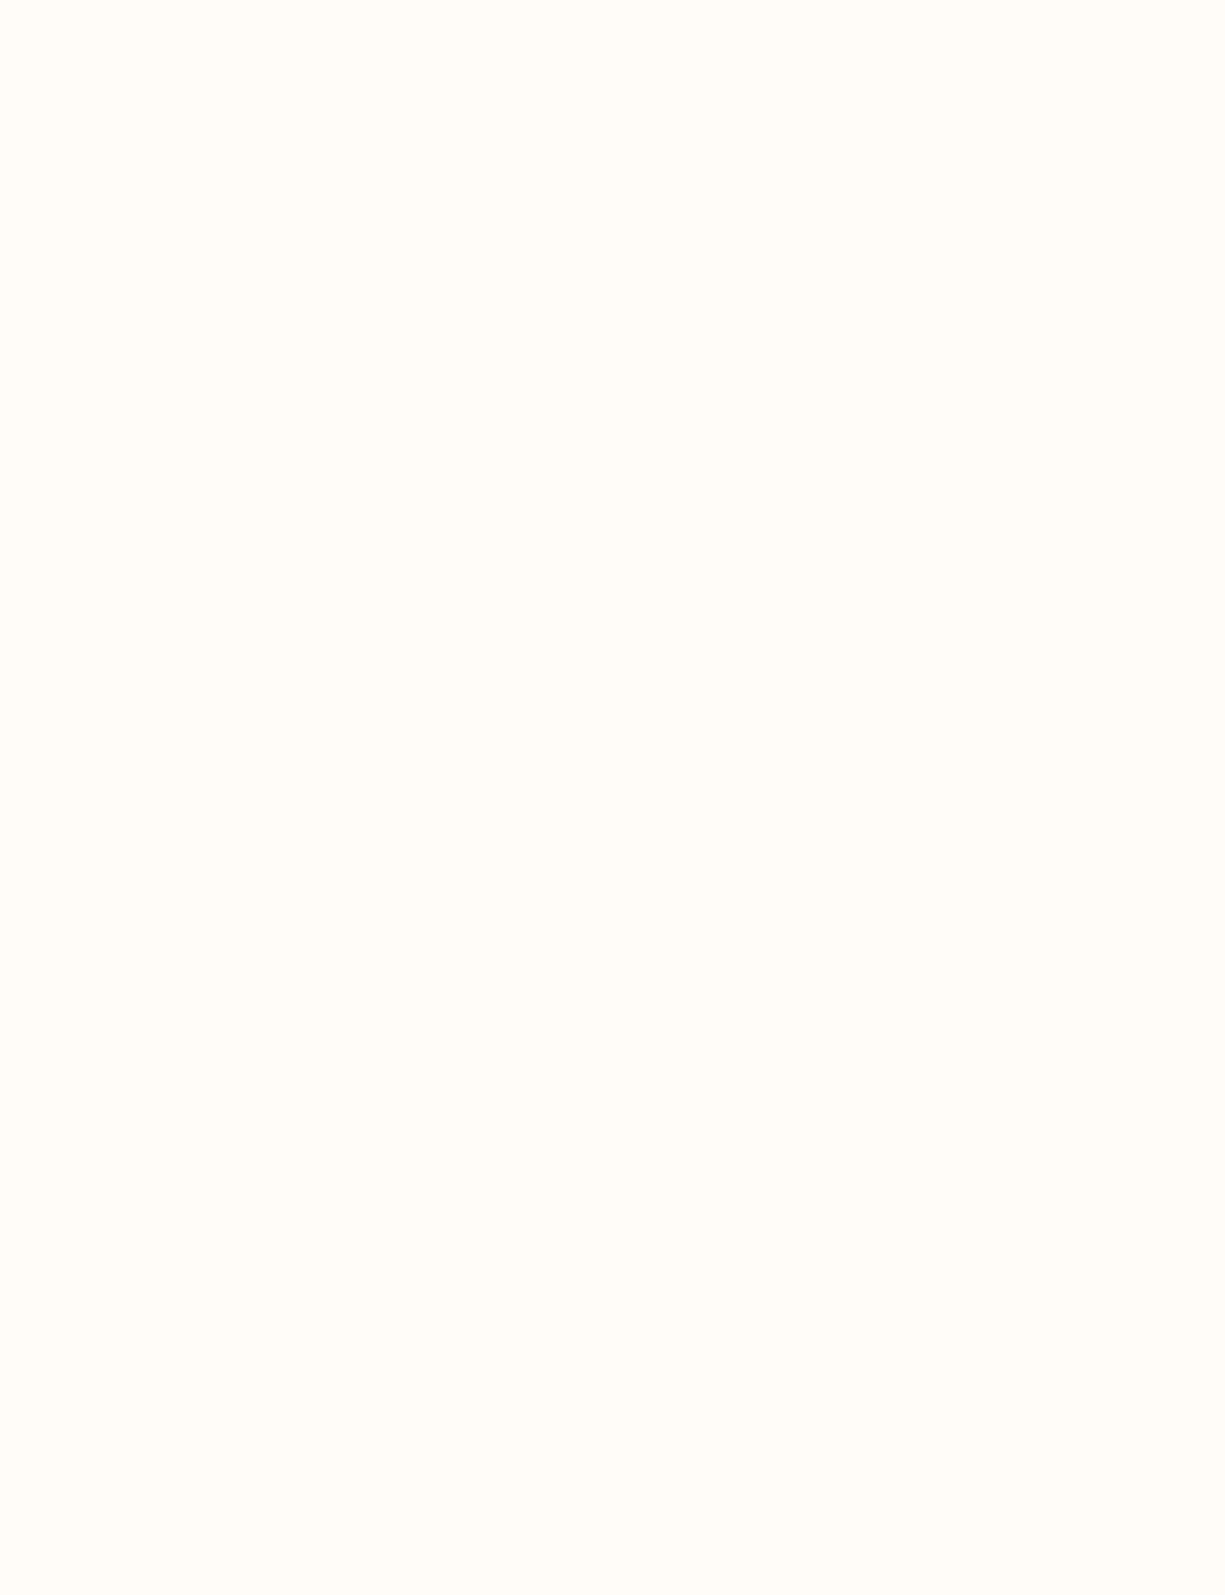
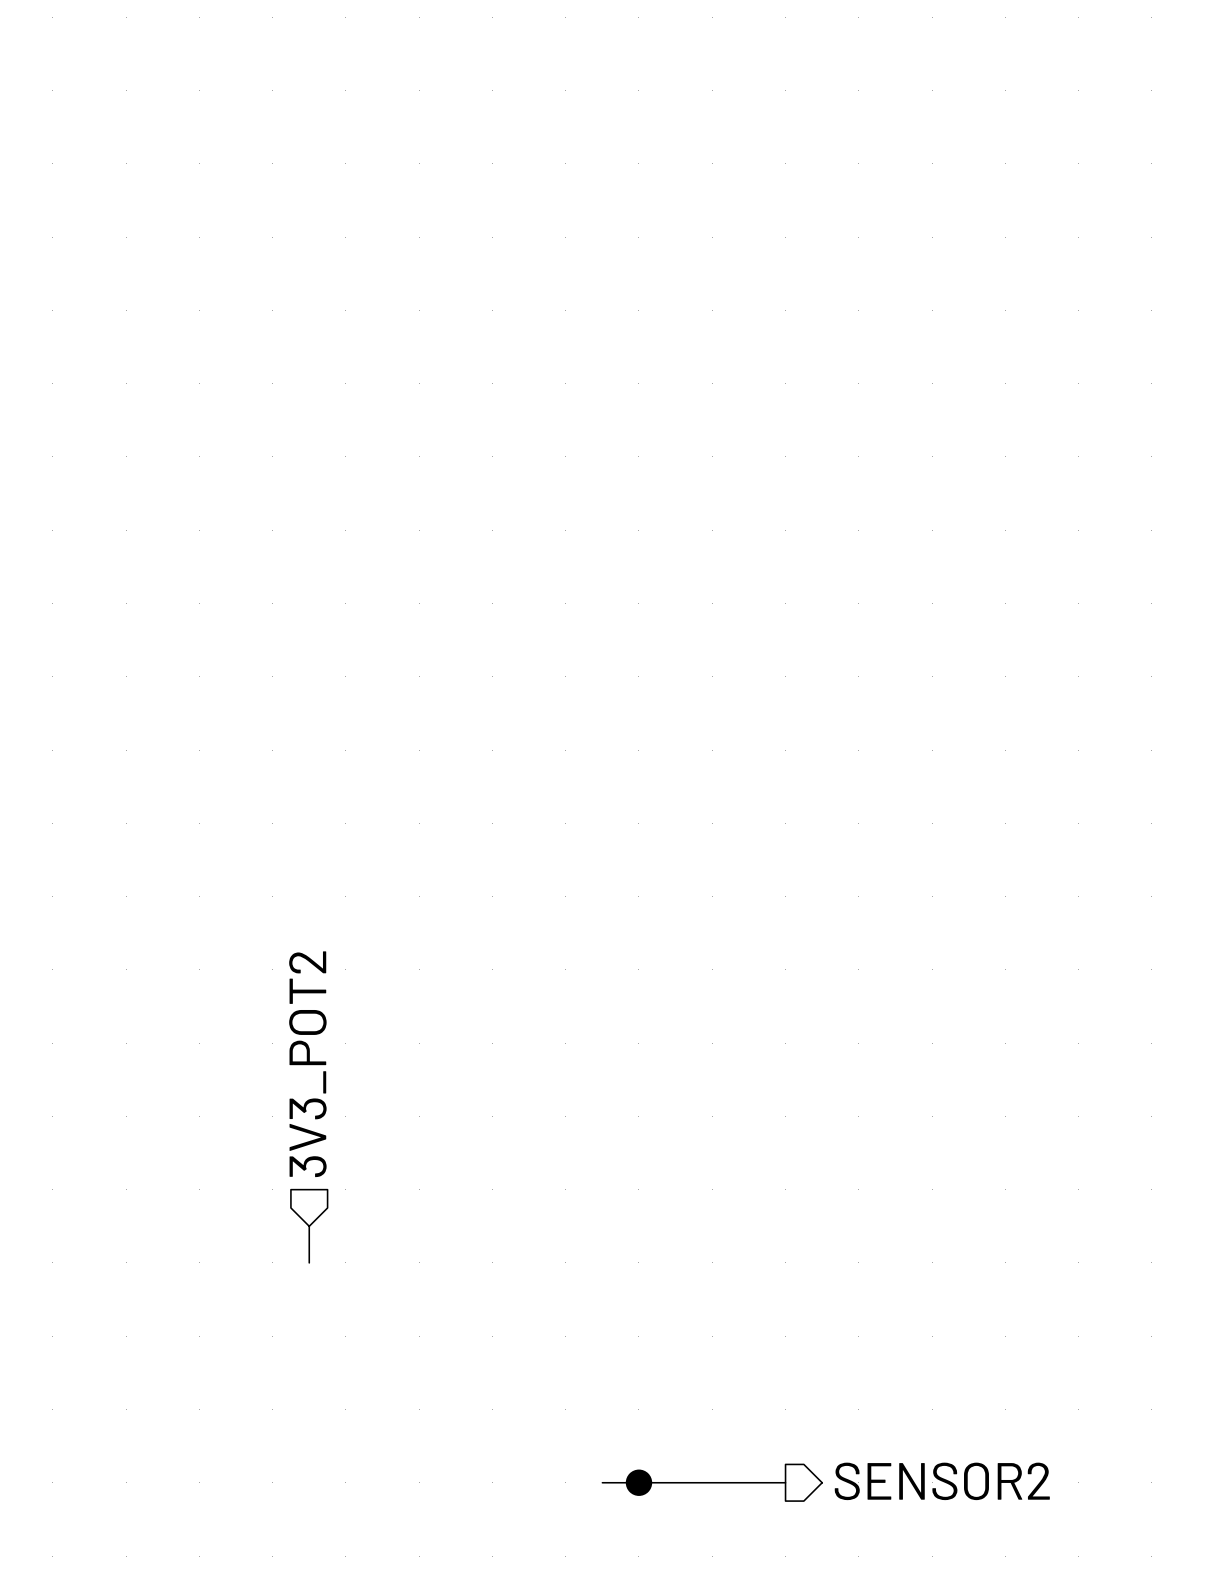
hierarchical label: none -> 3V3_POT2 (307, 1064)
wire: none -> (309, 1226) (309, 1262)
hierarchical label: none -> SENSOR2 (942, 1481)
wire: none -> (602, 1482) (785, 1482)
junction: none -> (638, 1482)

